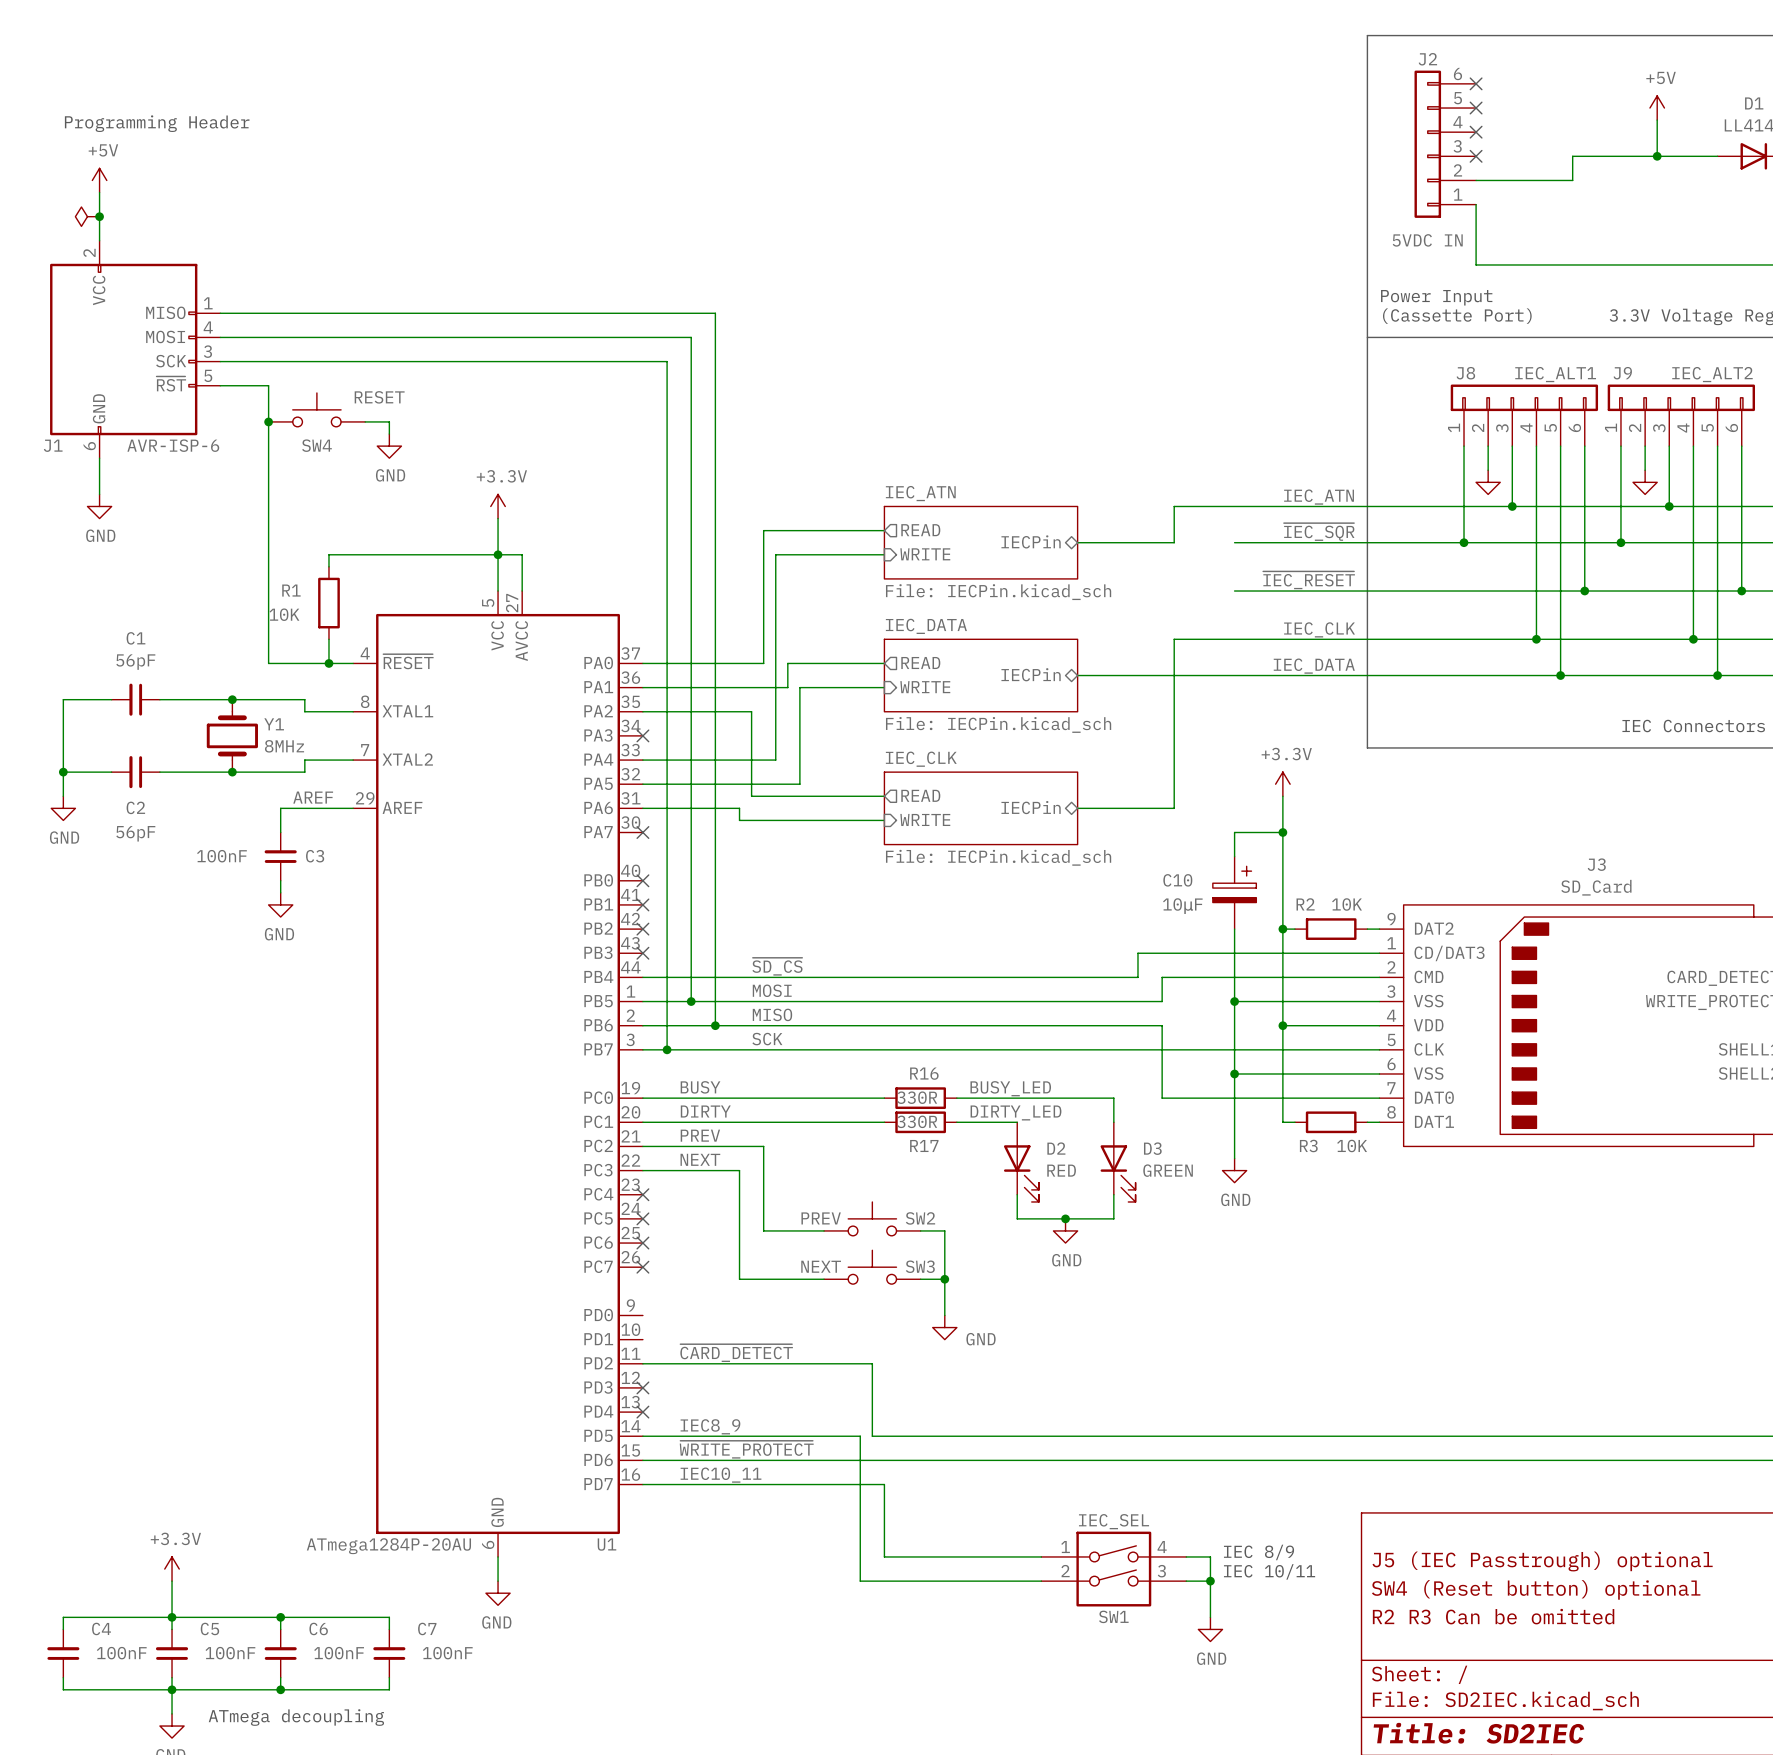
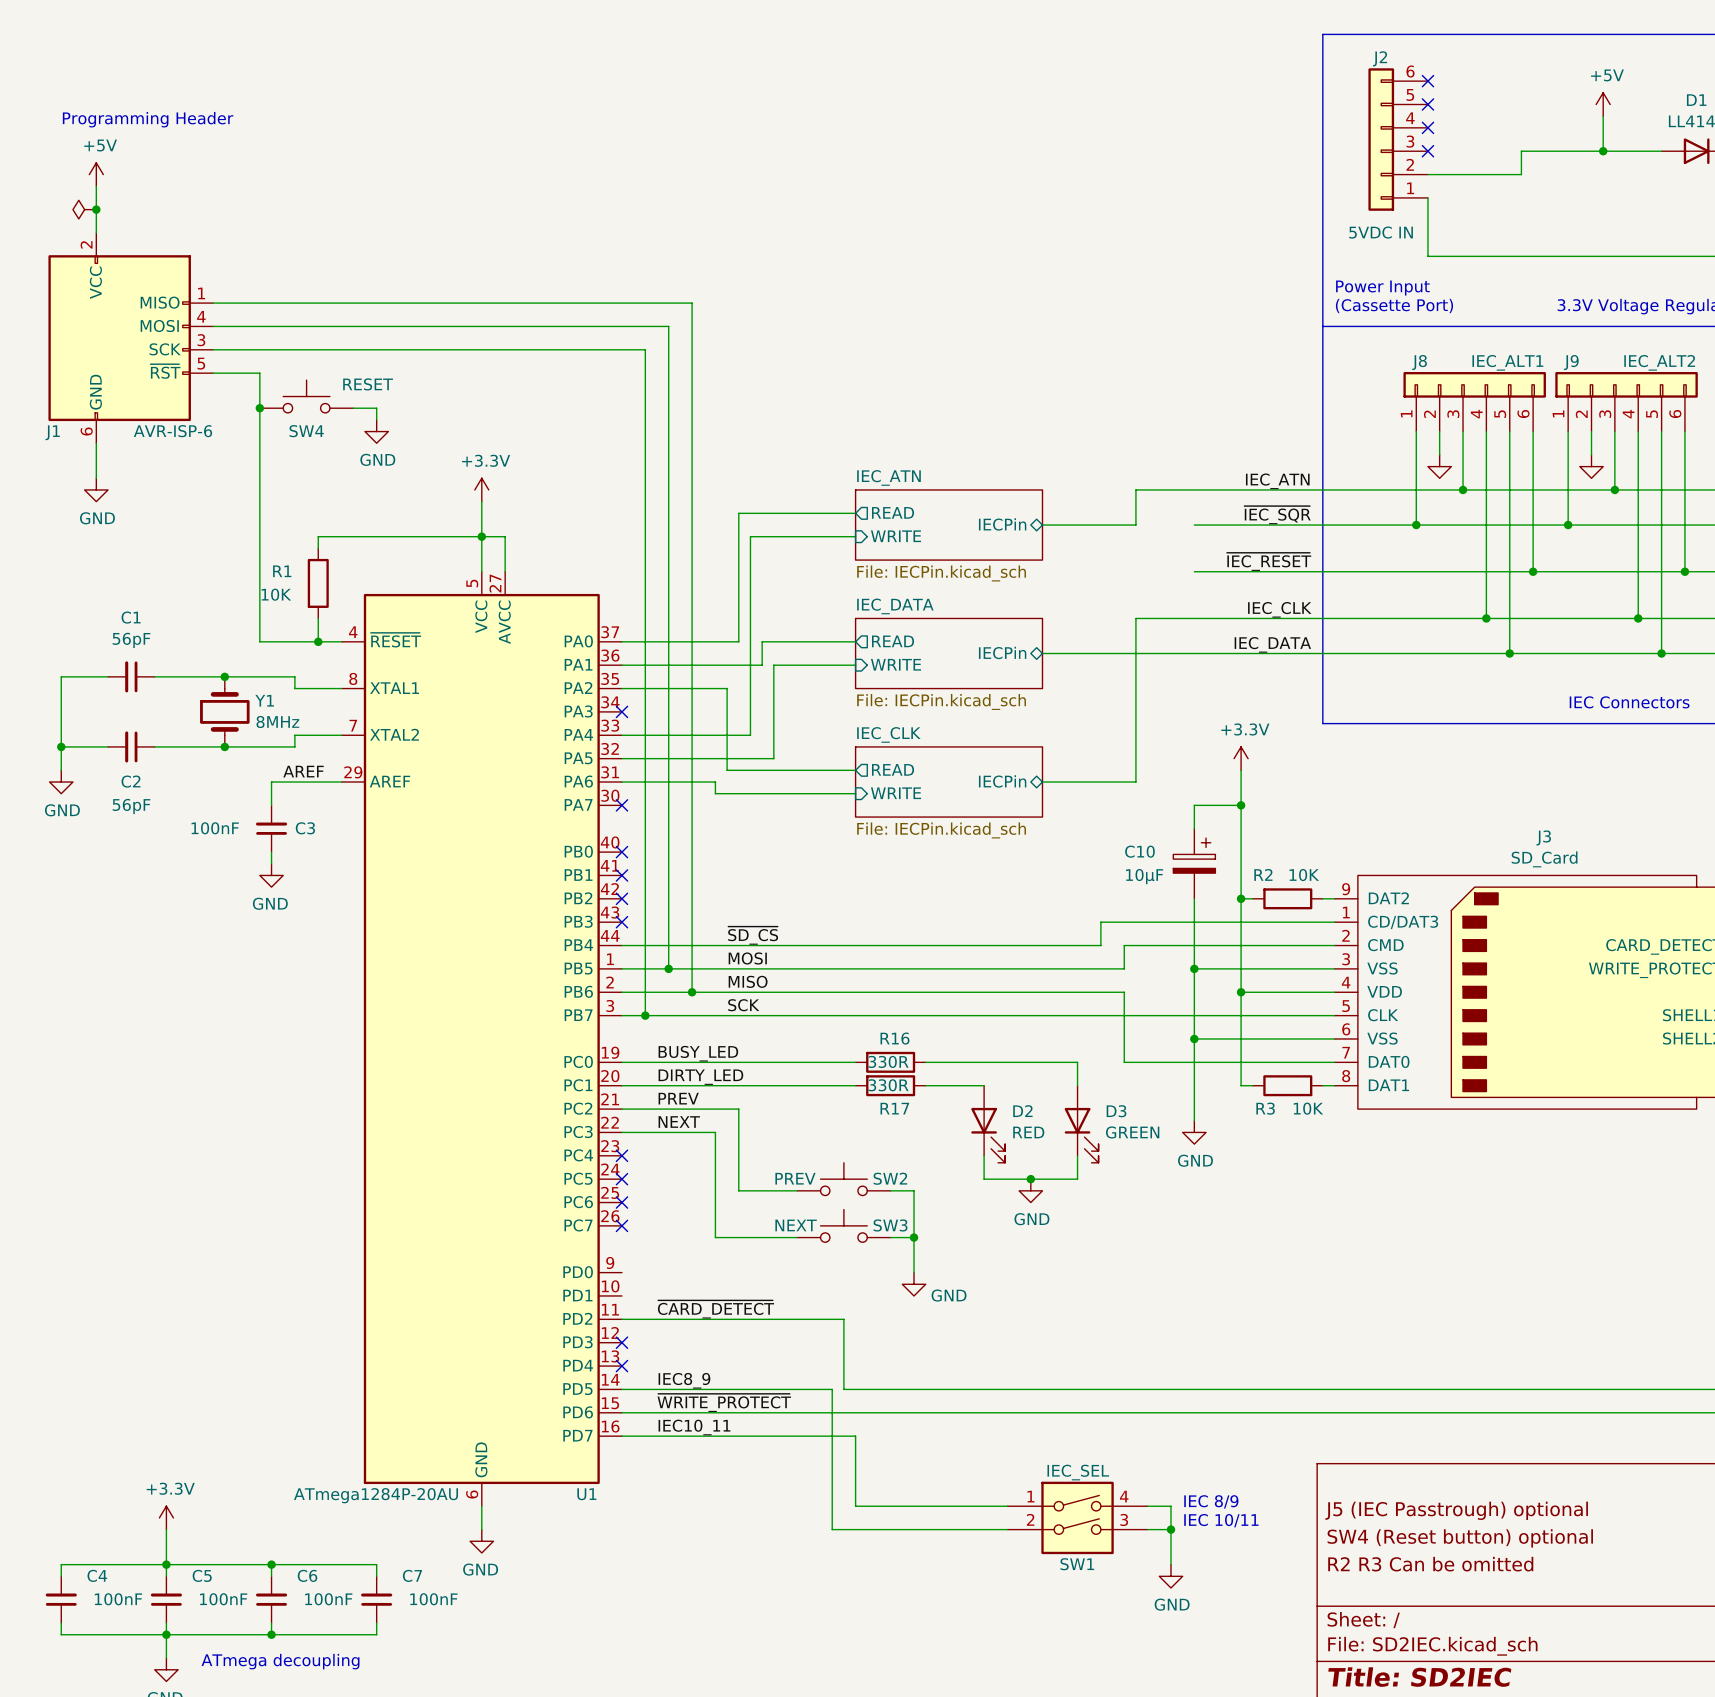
label: BUSY (700, 1087) -> BUSY_LED (698, 1053)
label: BUSY_LED (1010, 1088) -> none
label: DIRTY (705, 1111) -> DIRTY_LED (700, 1077)
label: DIRTY_LED (1015, 1112) -> none

